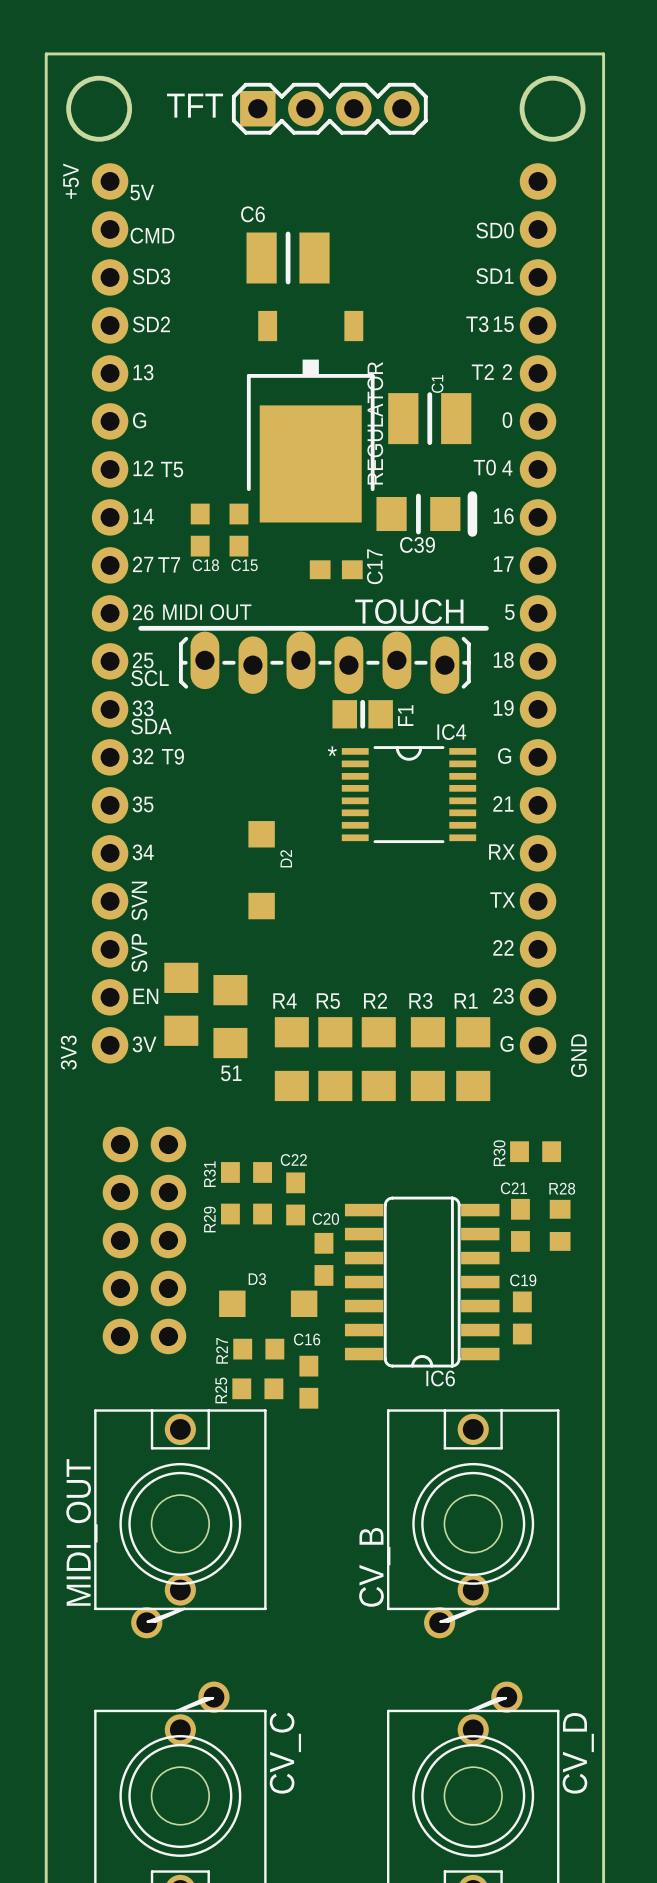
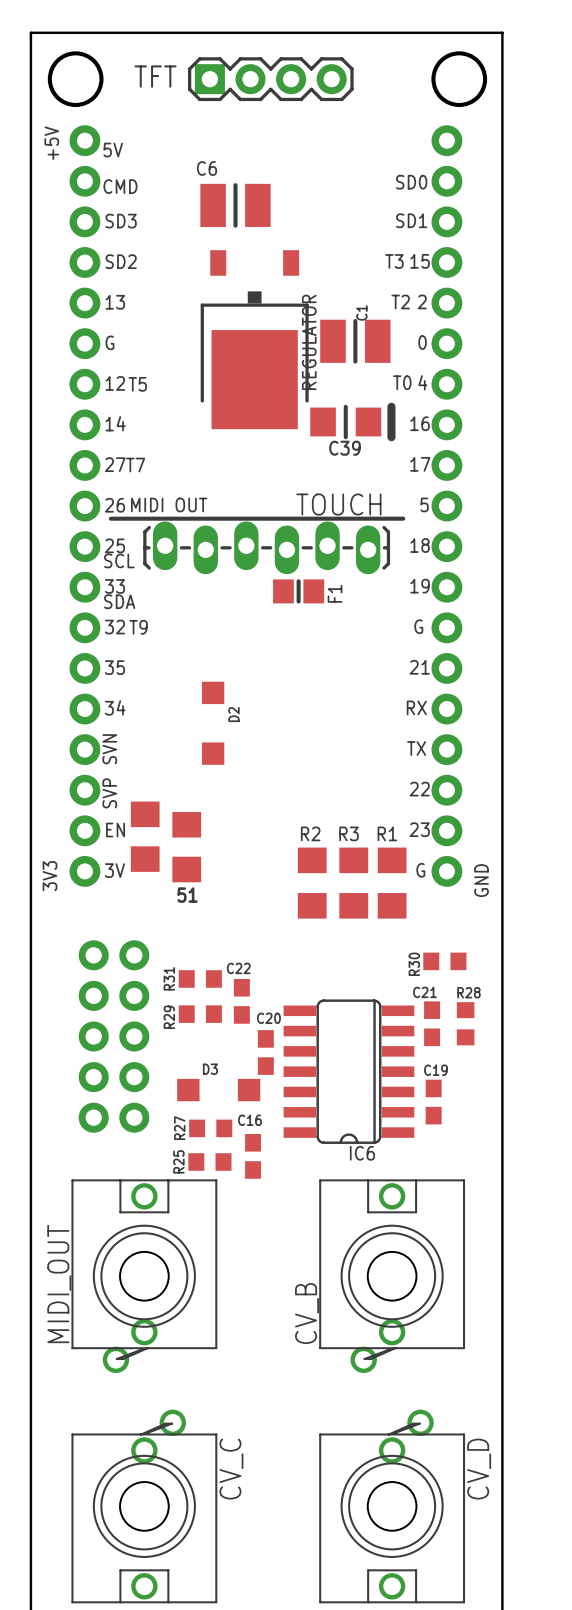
C18: (200, 530) -> none
C15: (238, 530) -> none
C17: (336, 569) -> none
IC4: (408, 794) -> none
R4: (291, 1059) -> none
R5: (335, 1059) -> none

